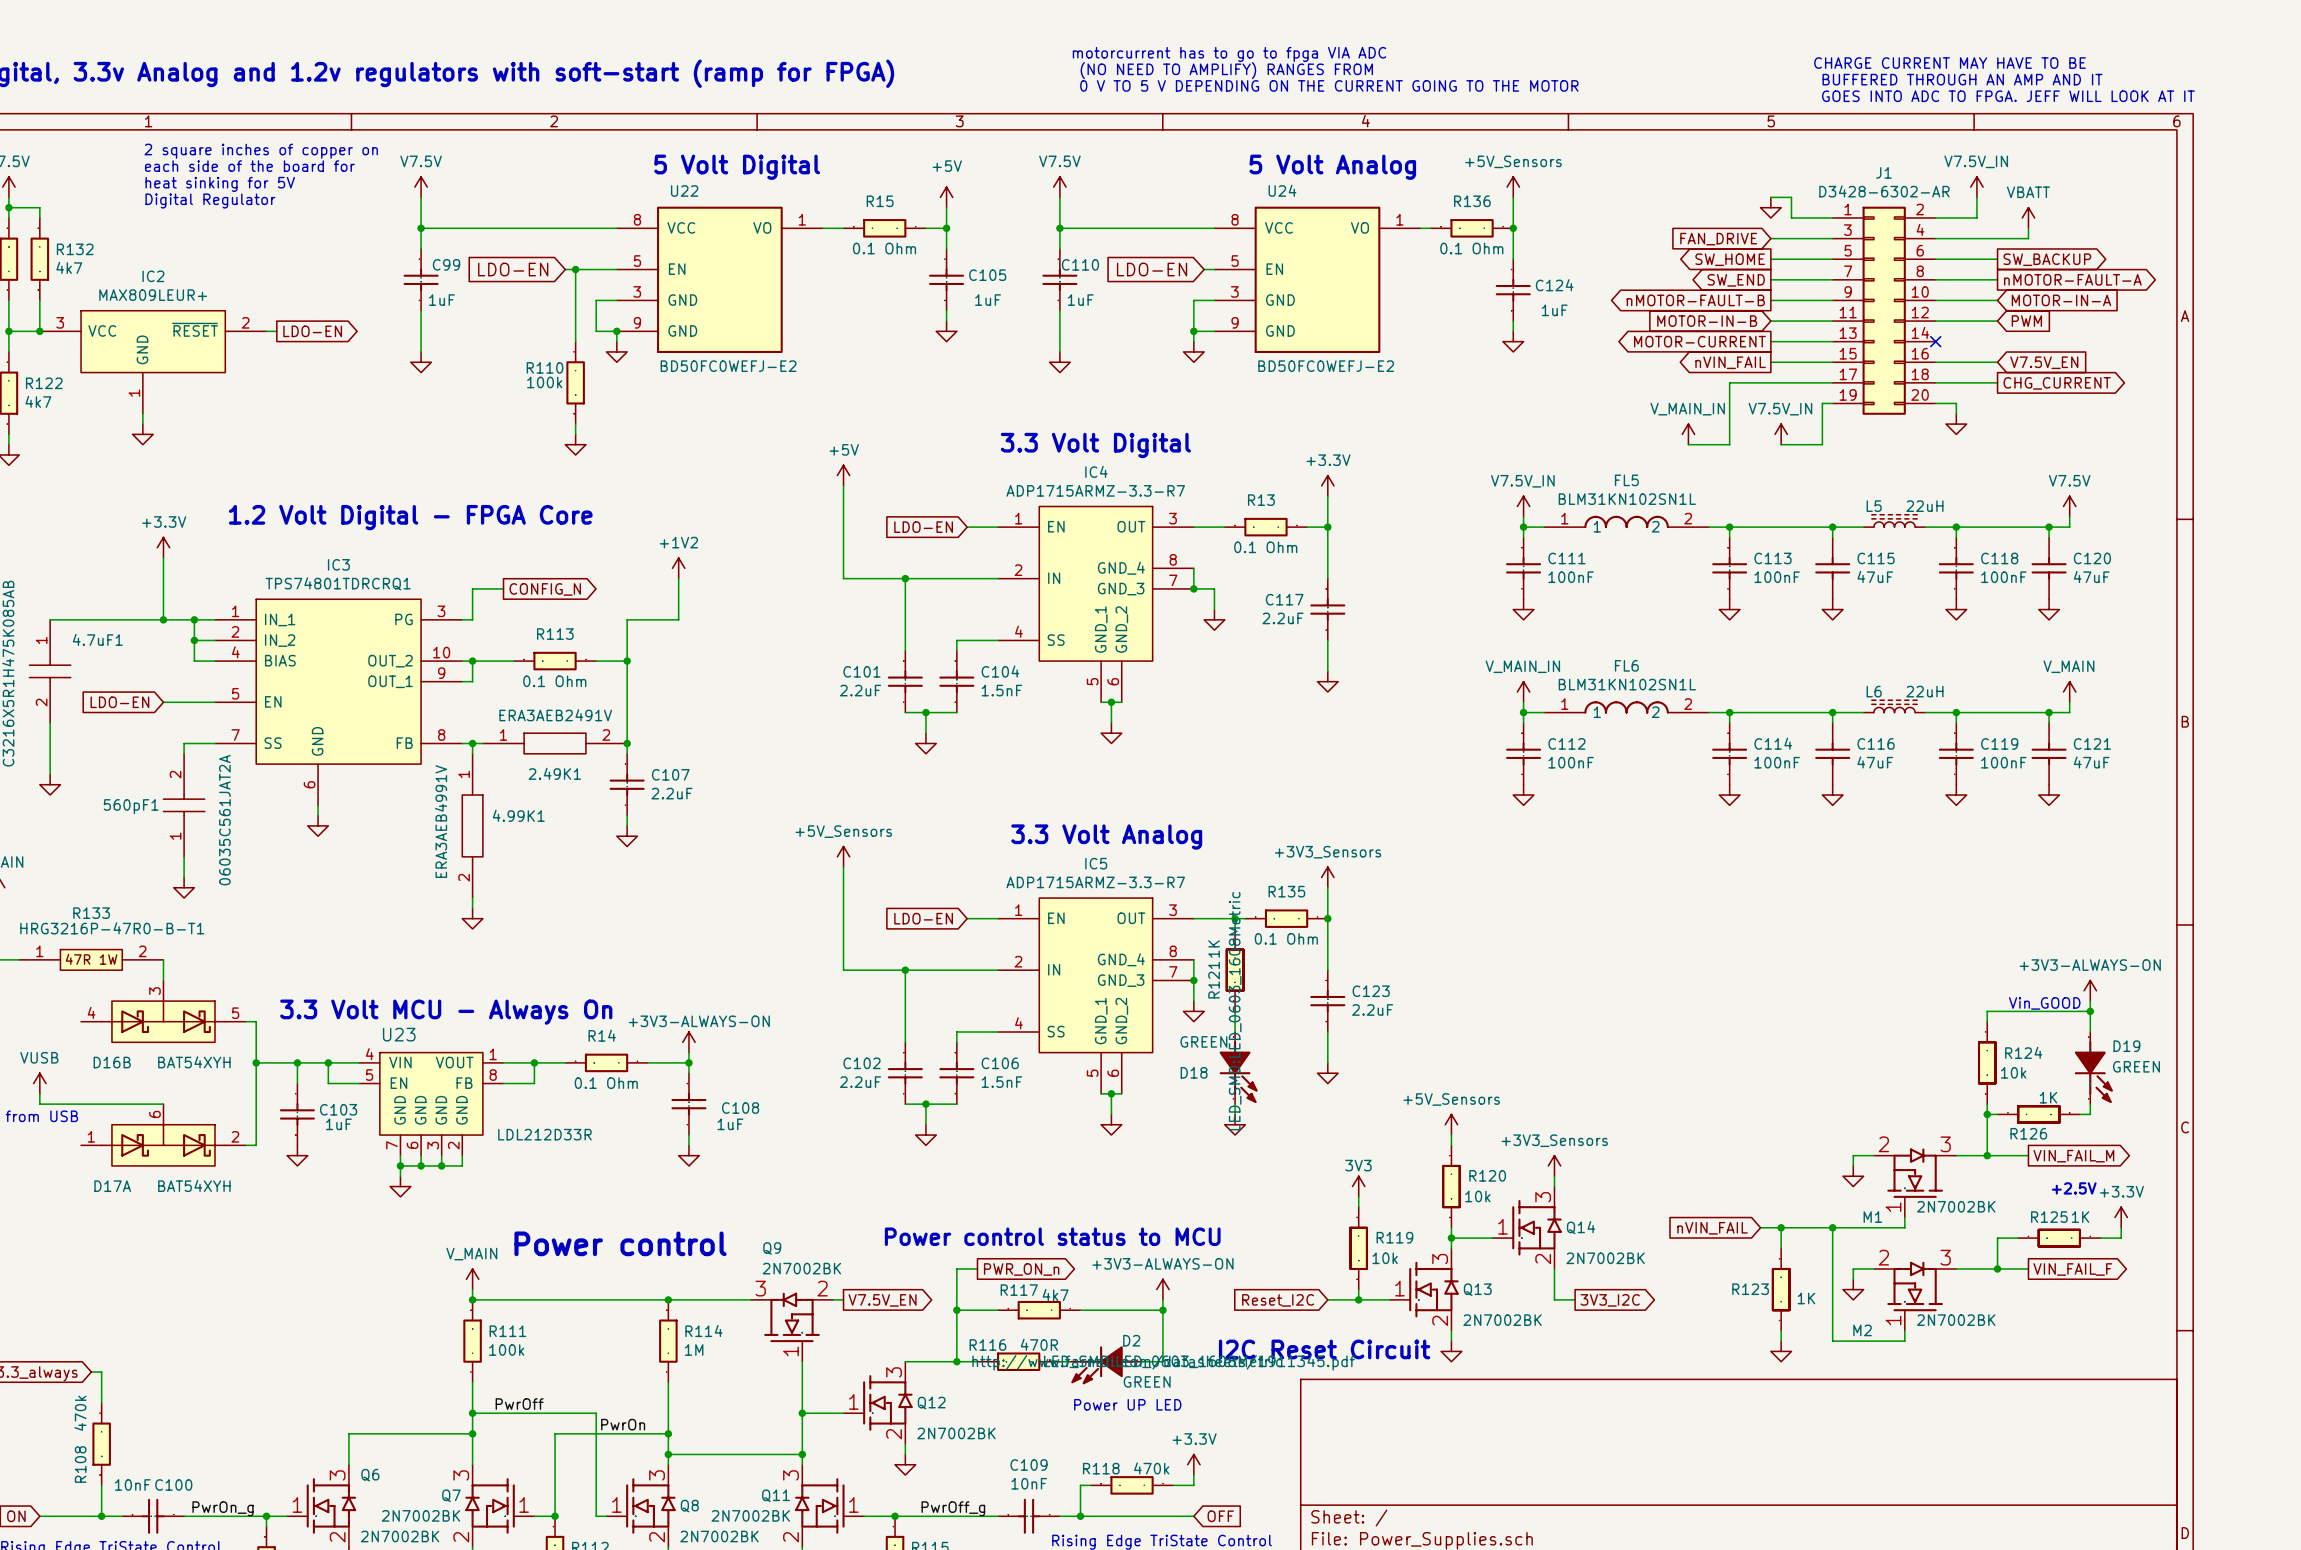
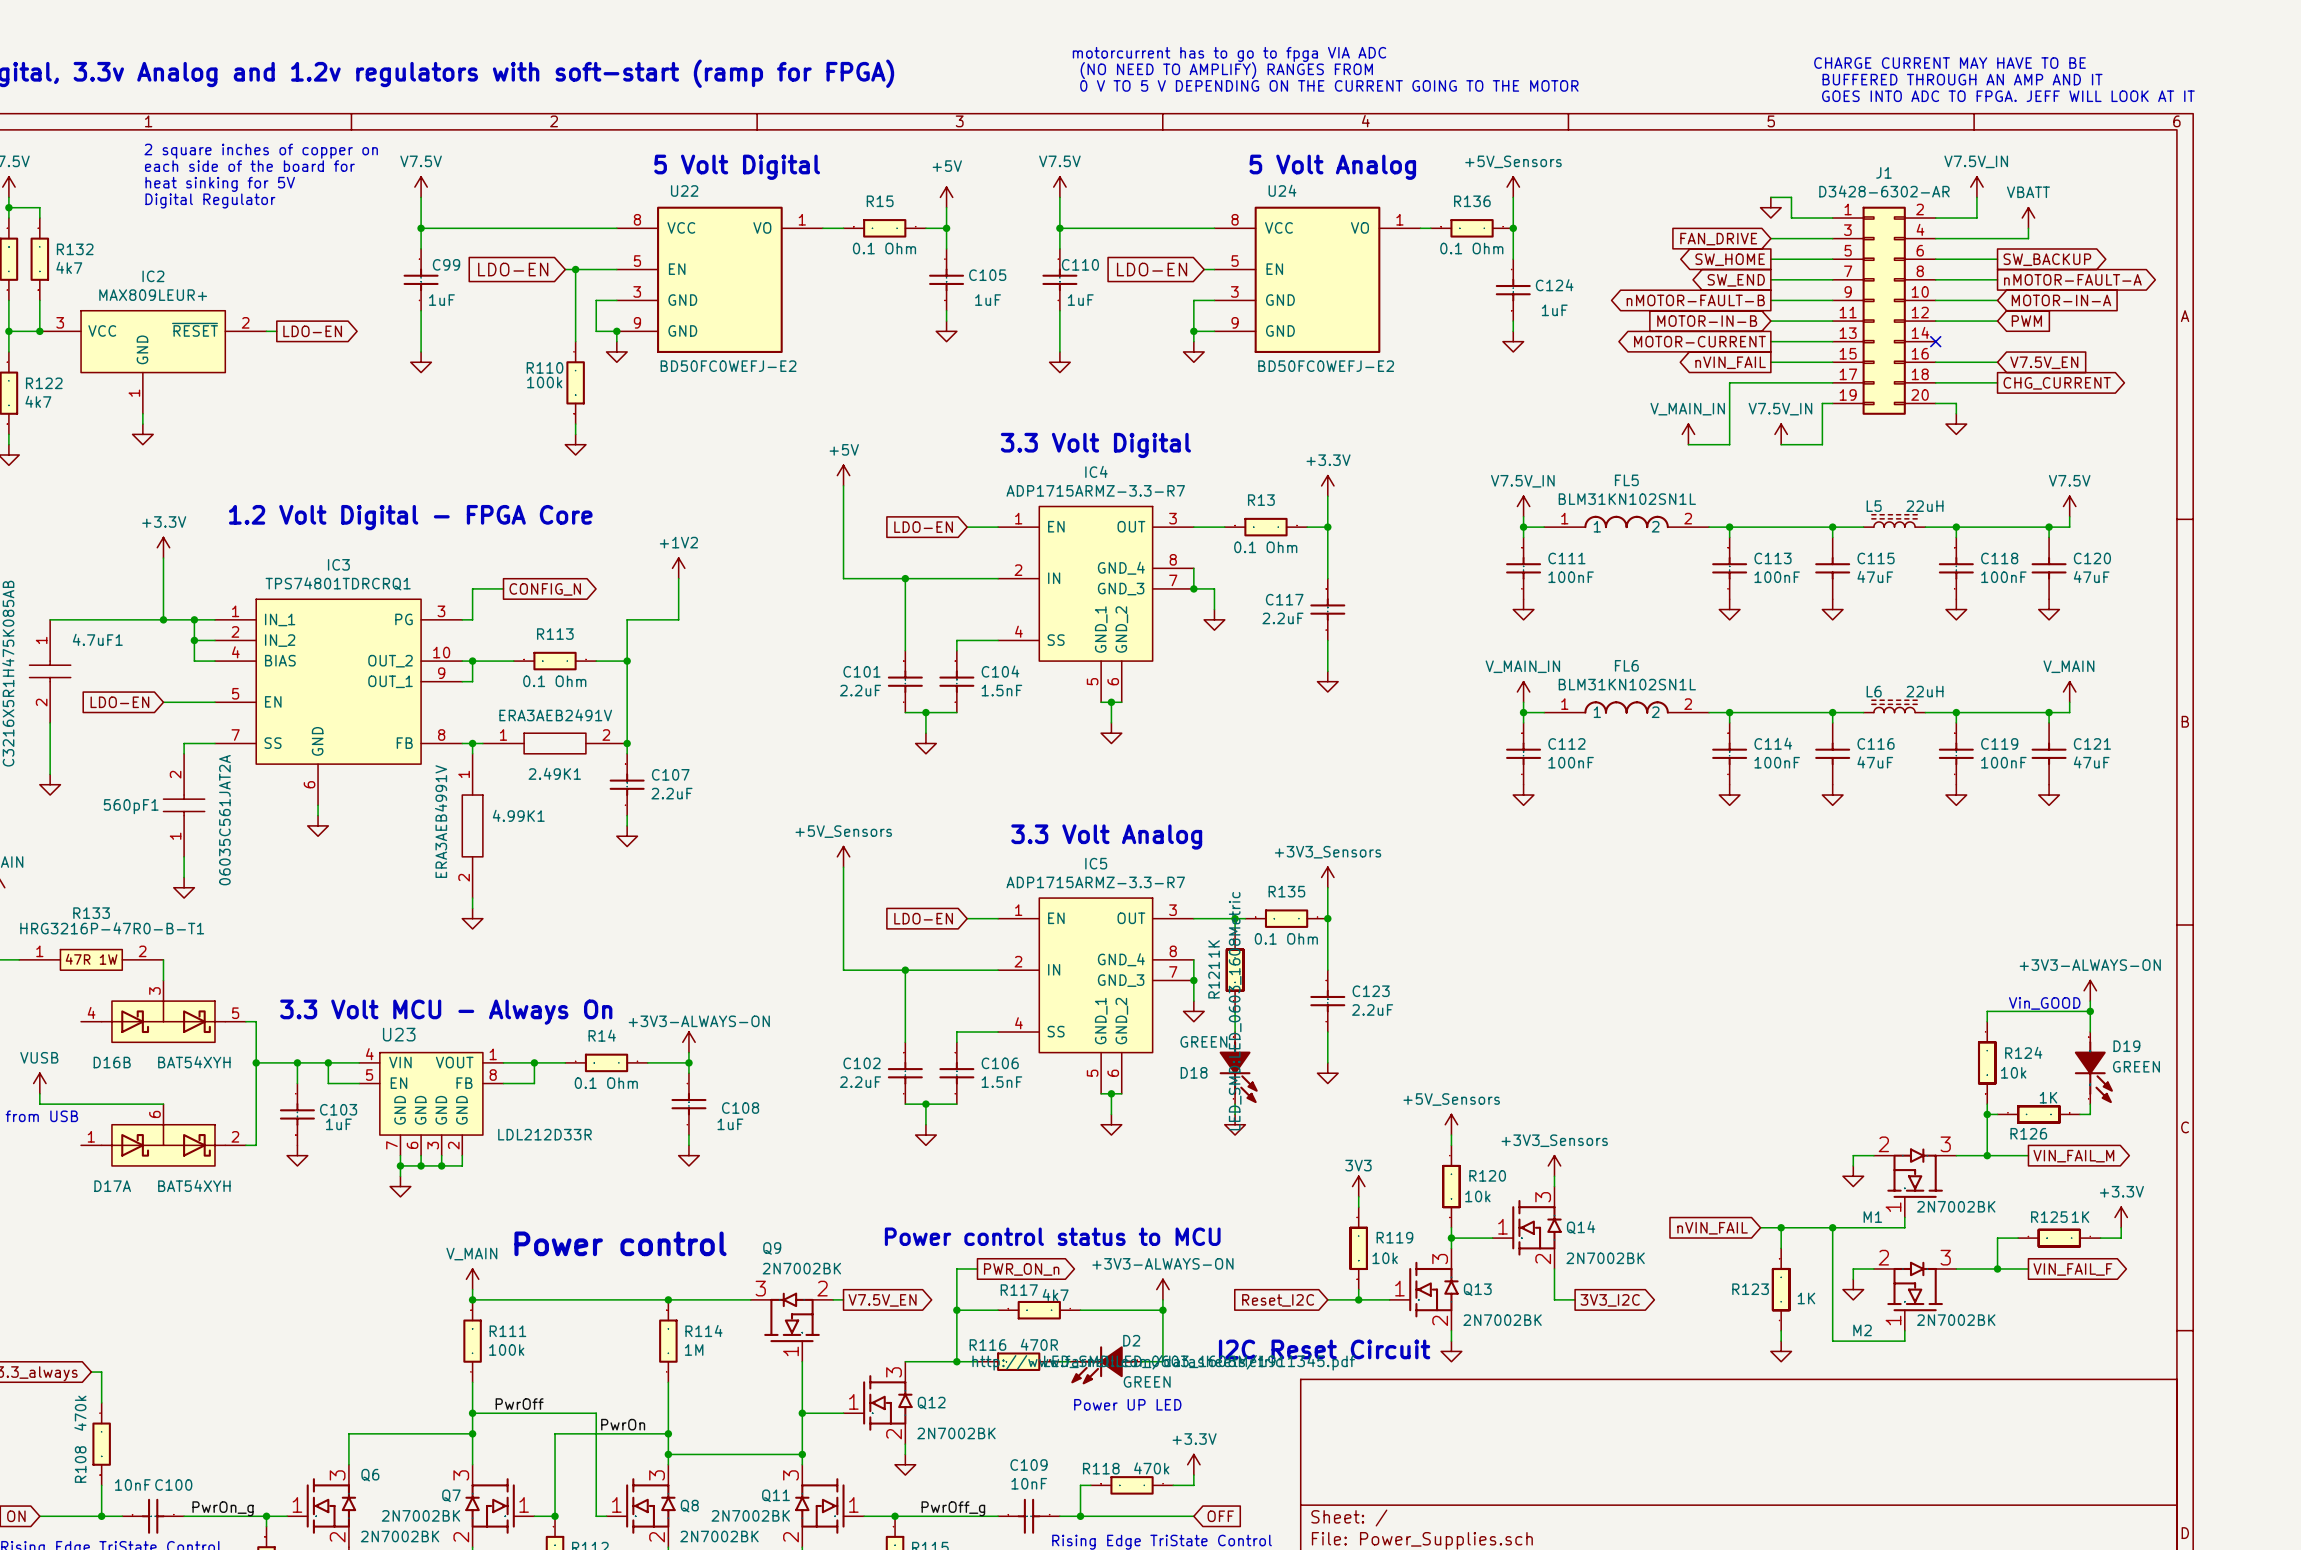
text: +2.5V (2074, 1188) -> none

